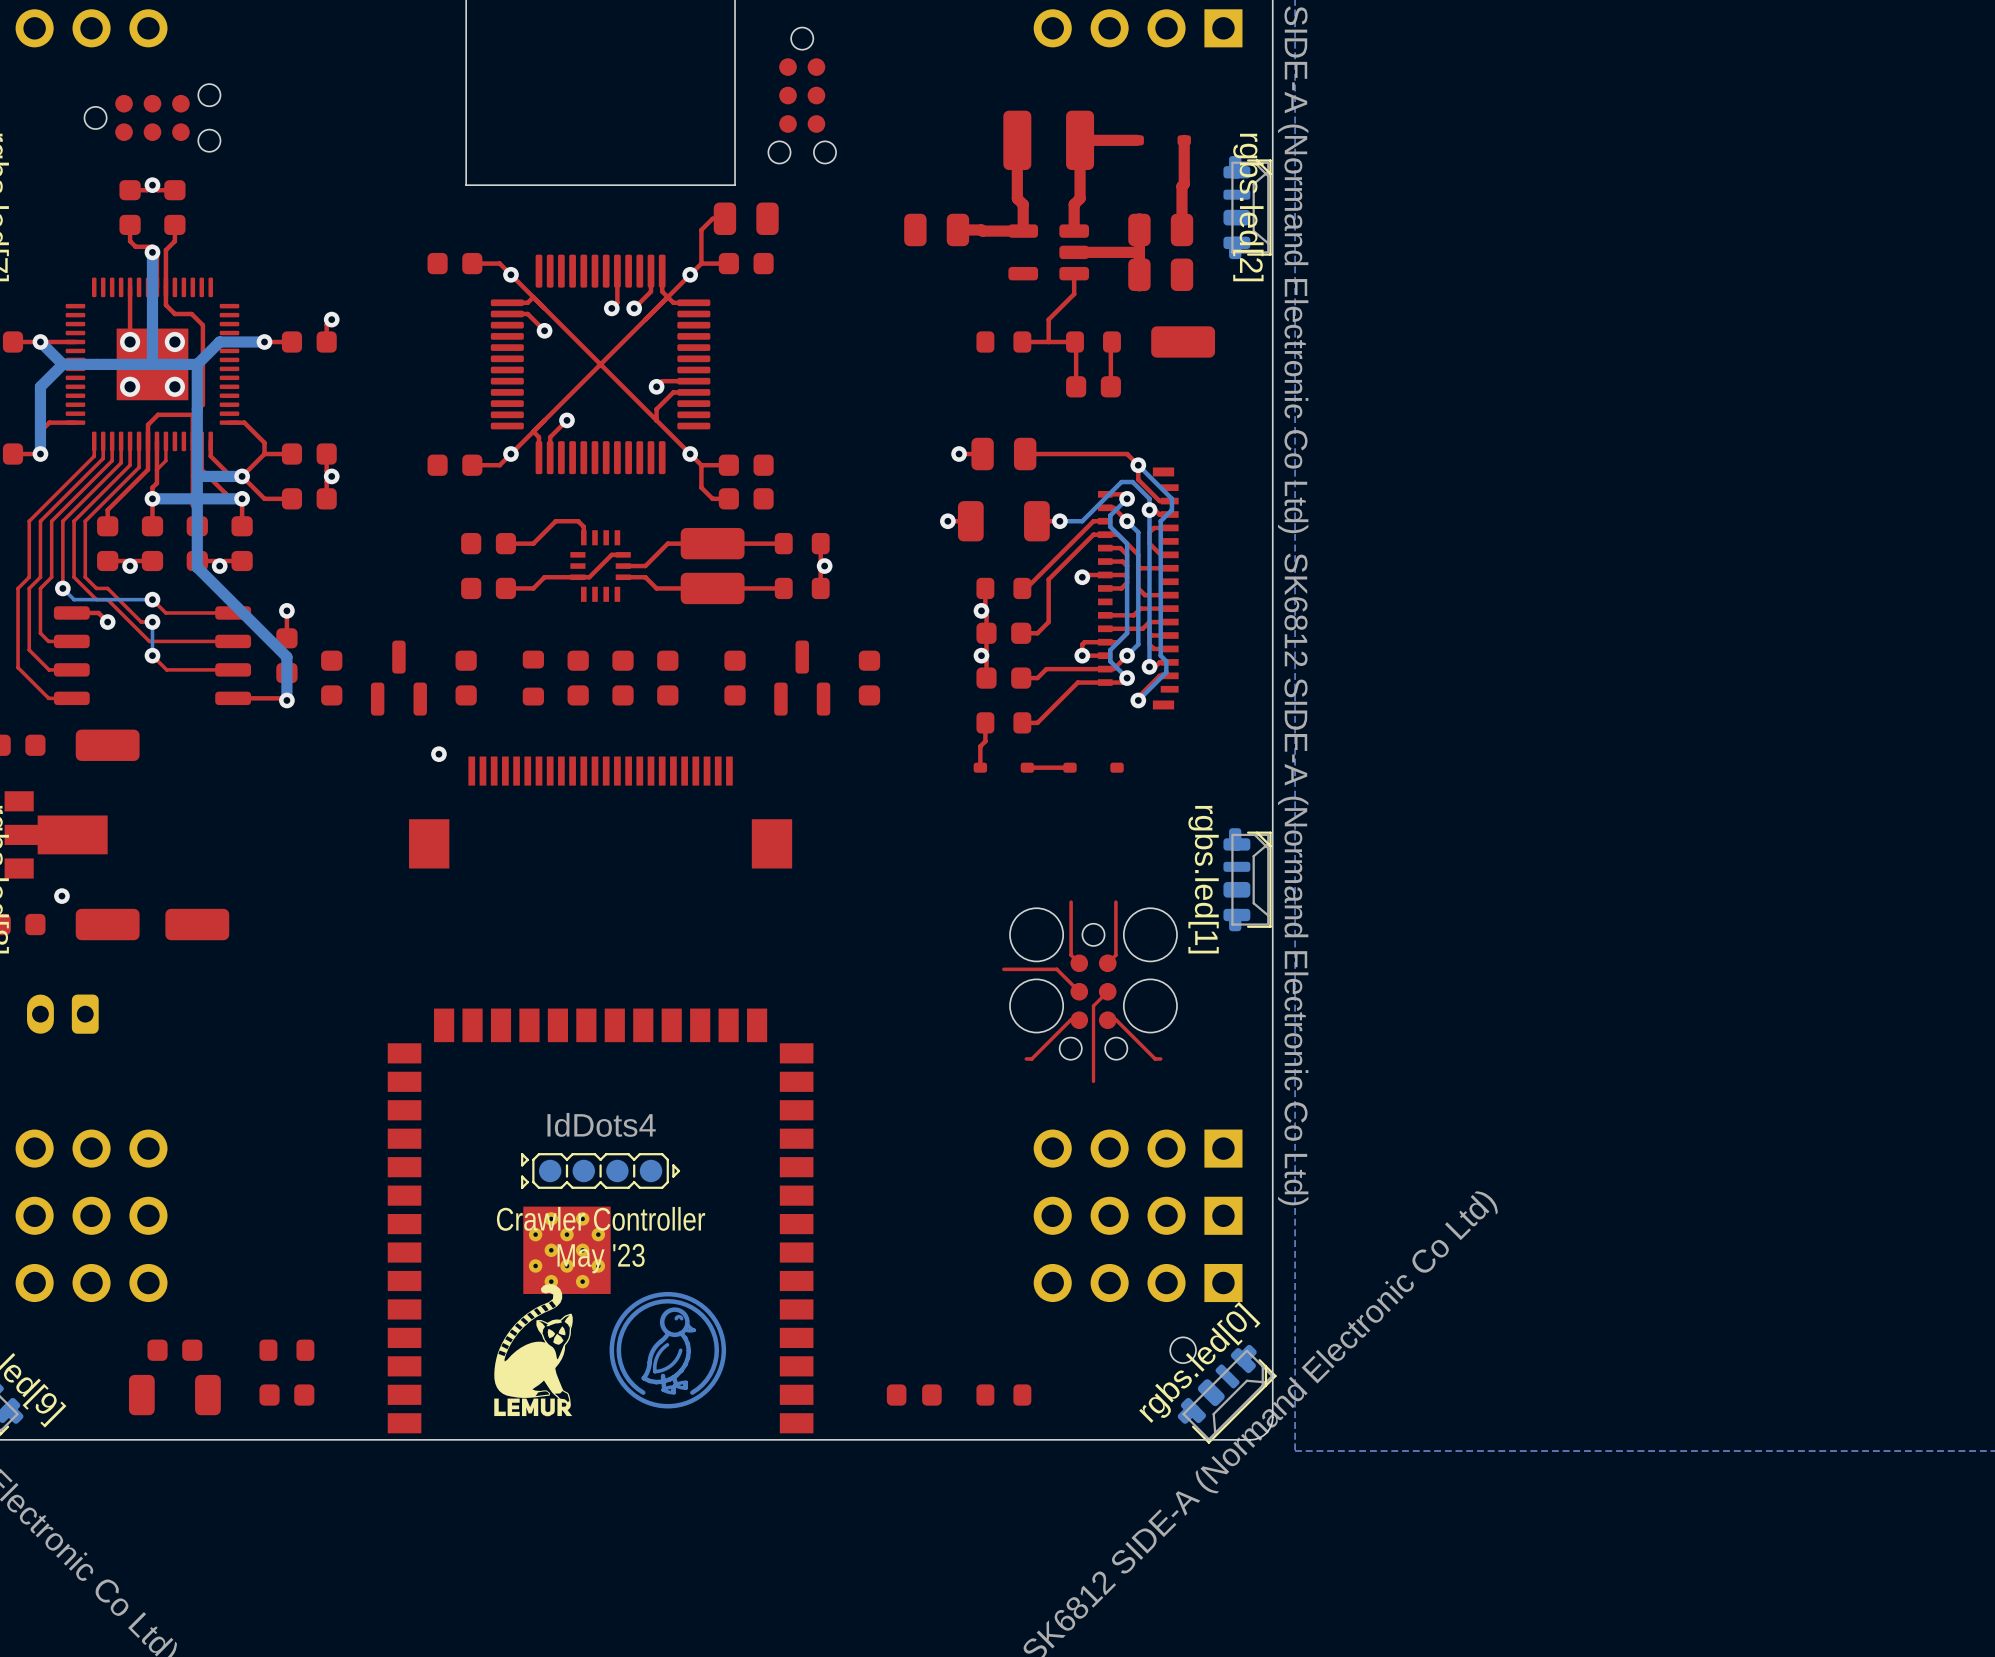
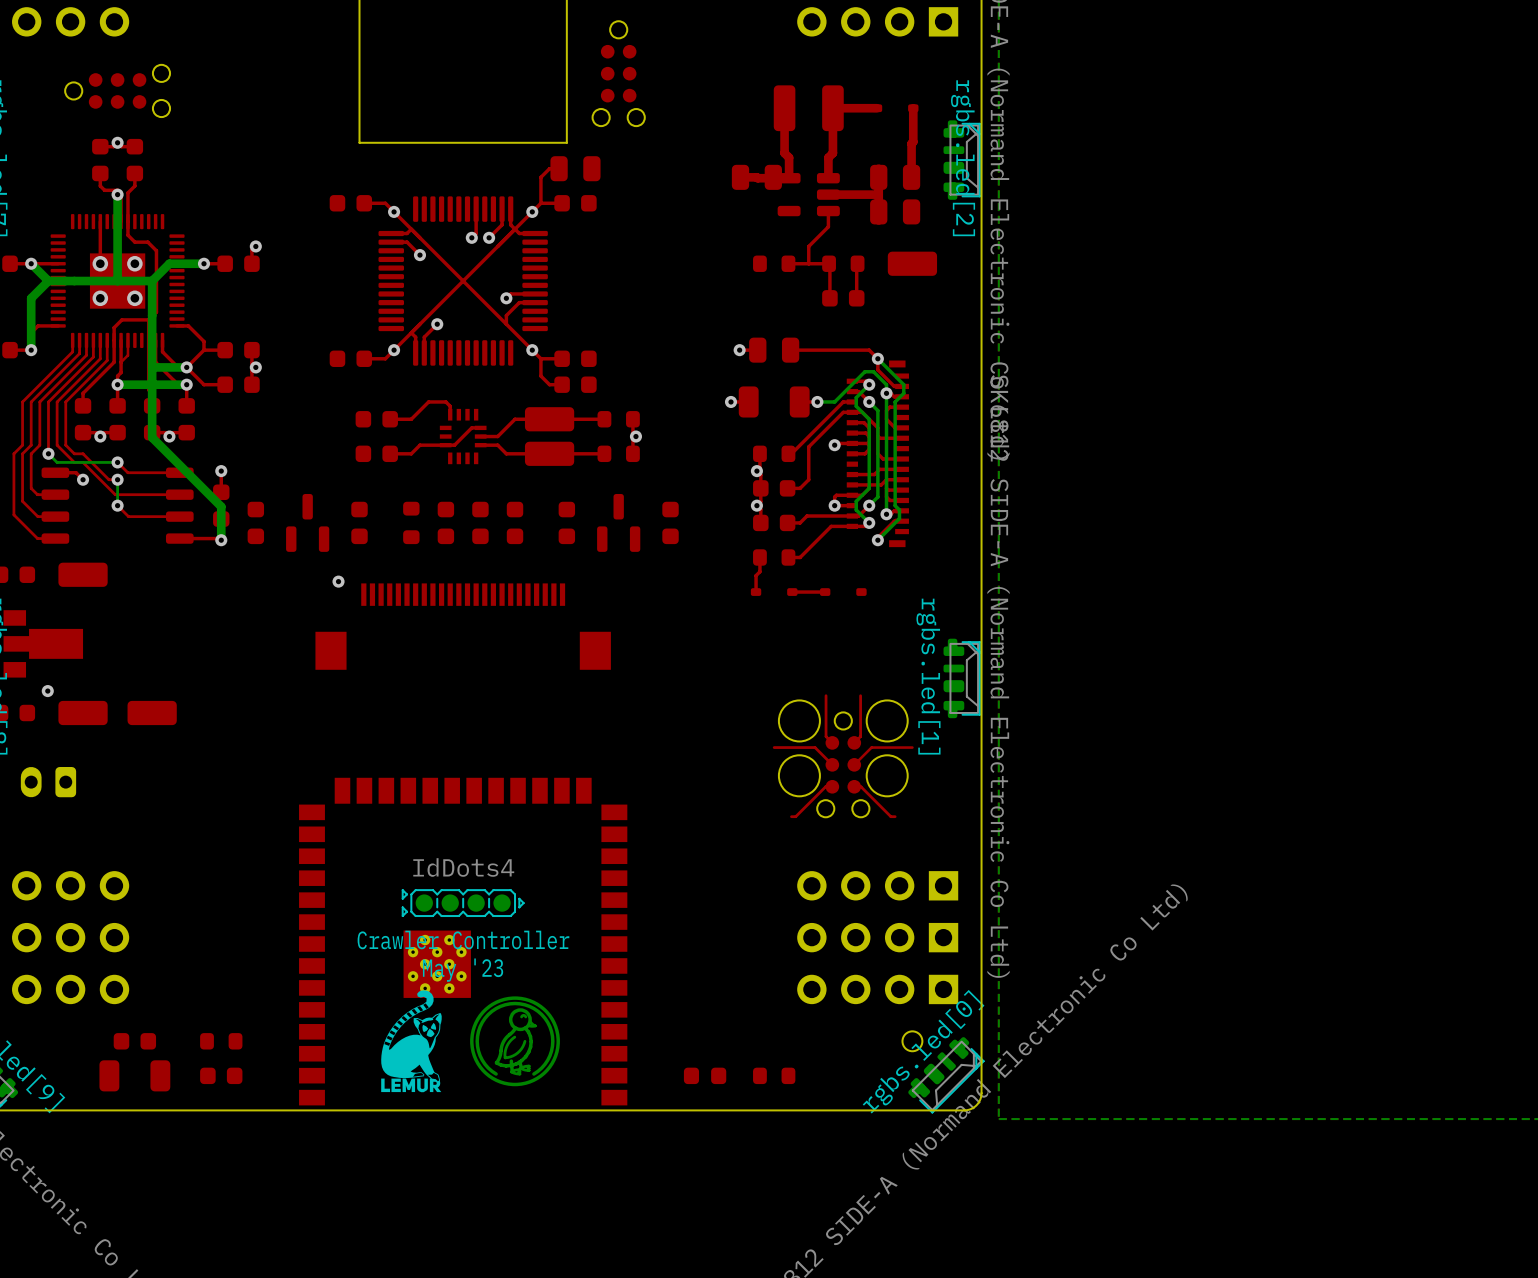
part position: (936, 229) -> (756, 177)
top track: (1107, 991) (1093, 1005) (1093, 1081) -> (854, 764) (871, 747) (912, 747)

